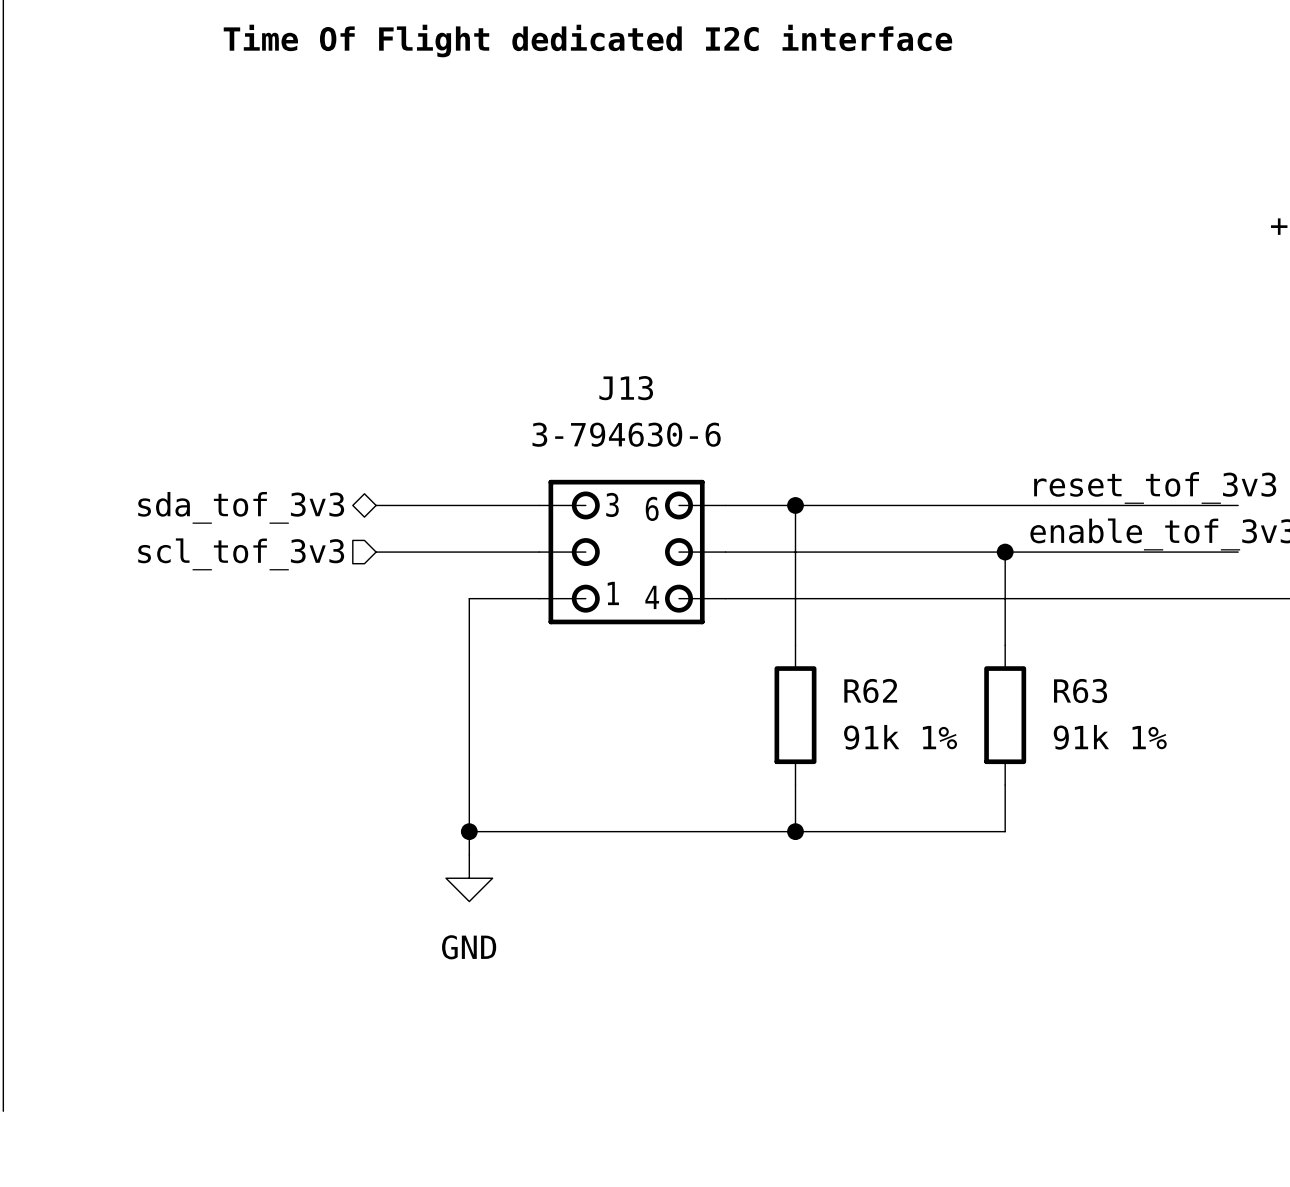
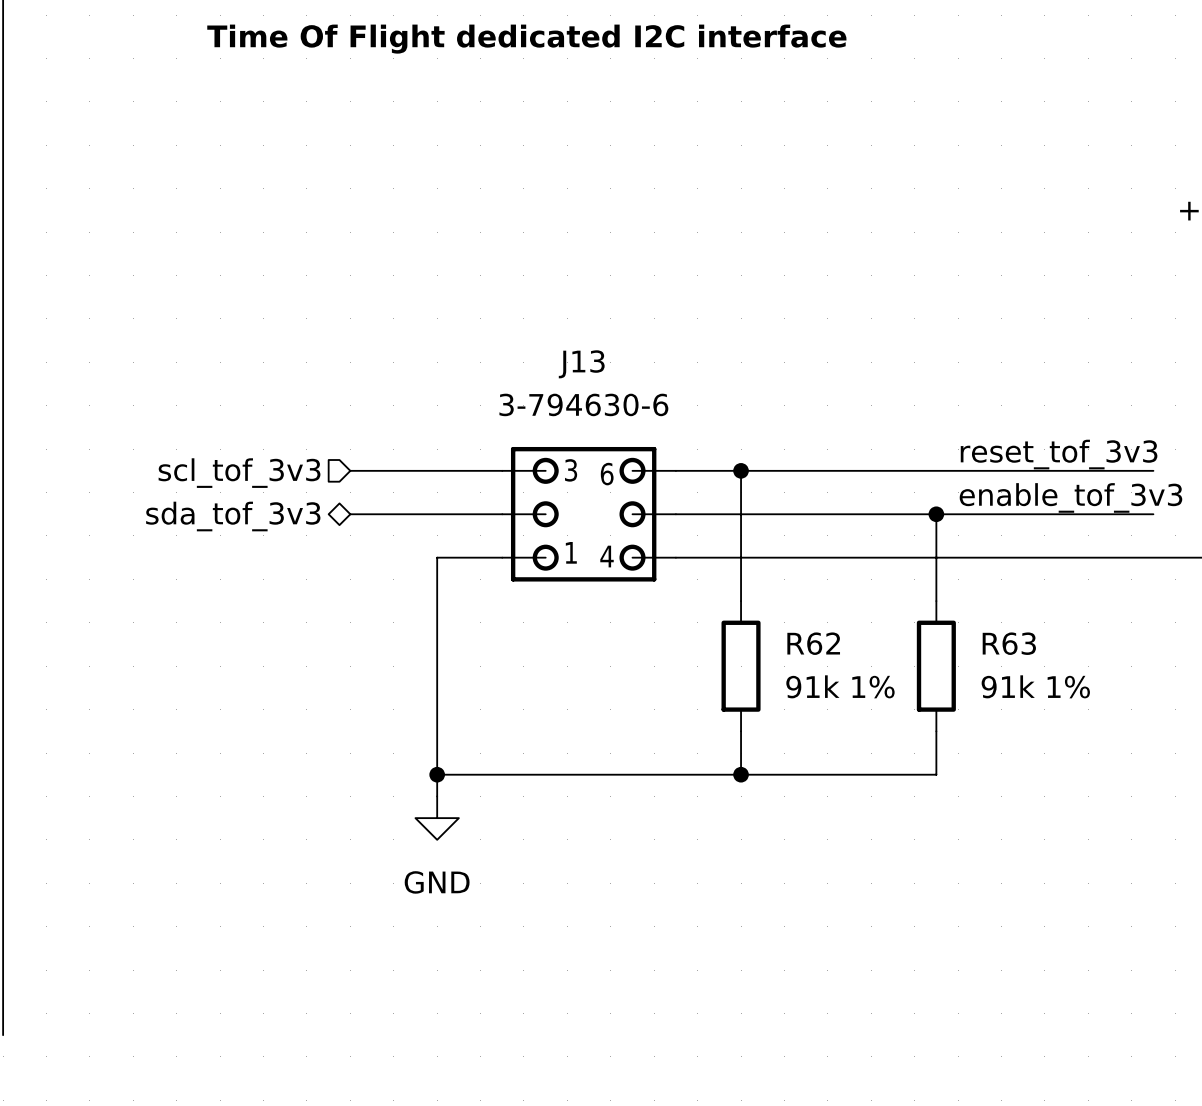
hierarchical label shape: bidirectional (241, 507) -> input (239, 473)
hierarchical label: sda_tof_3v3 (241, 507) -> scl_tof_3v3 (239, 473)
hierarchical label shape: input (241, 554) -> bidirectional (233, 516)
hierarchical label: scl_tof_3v3 (241, 554) -> sda_tof_3v3 (233, 516)

